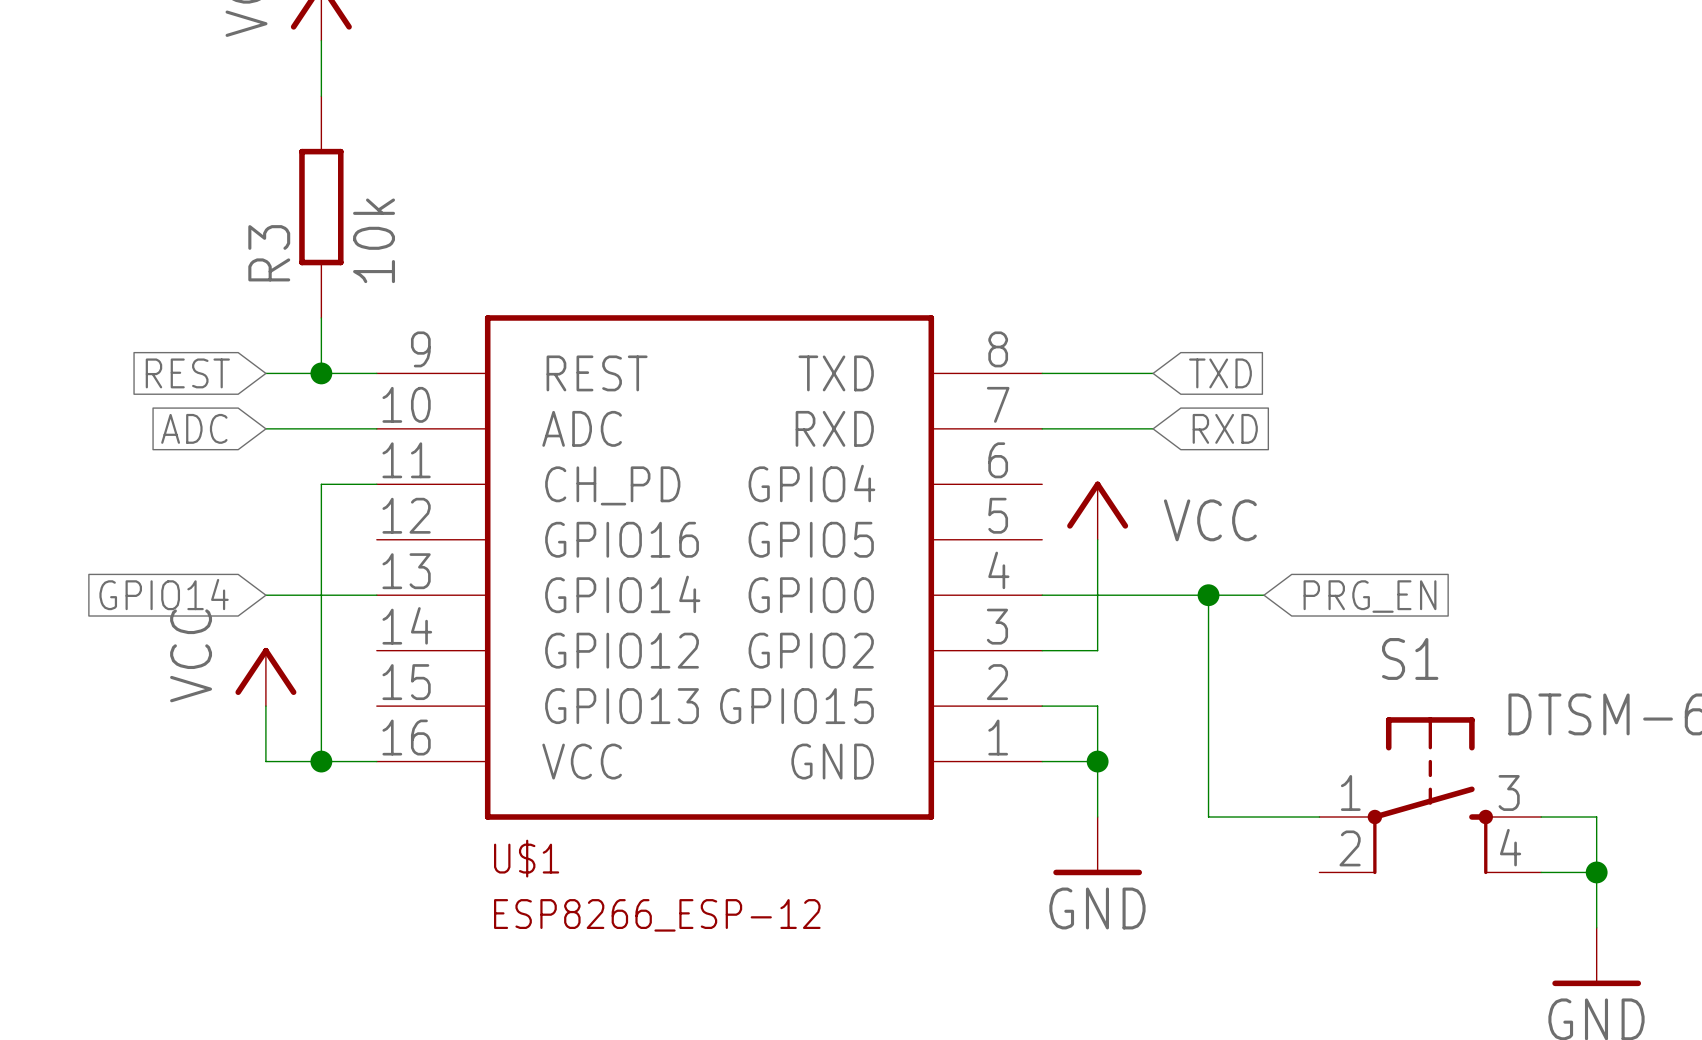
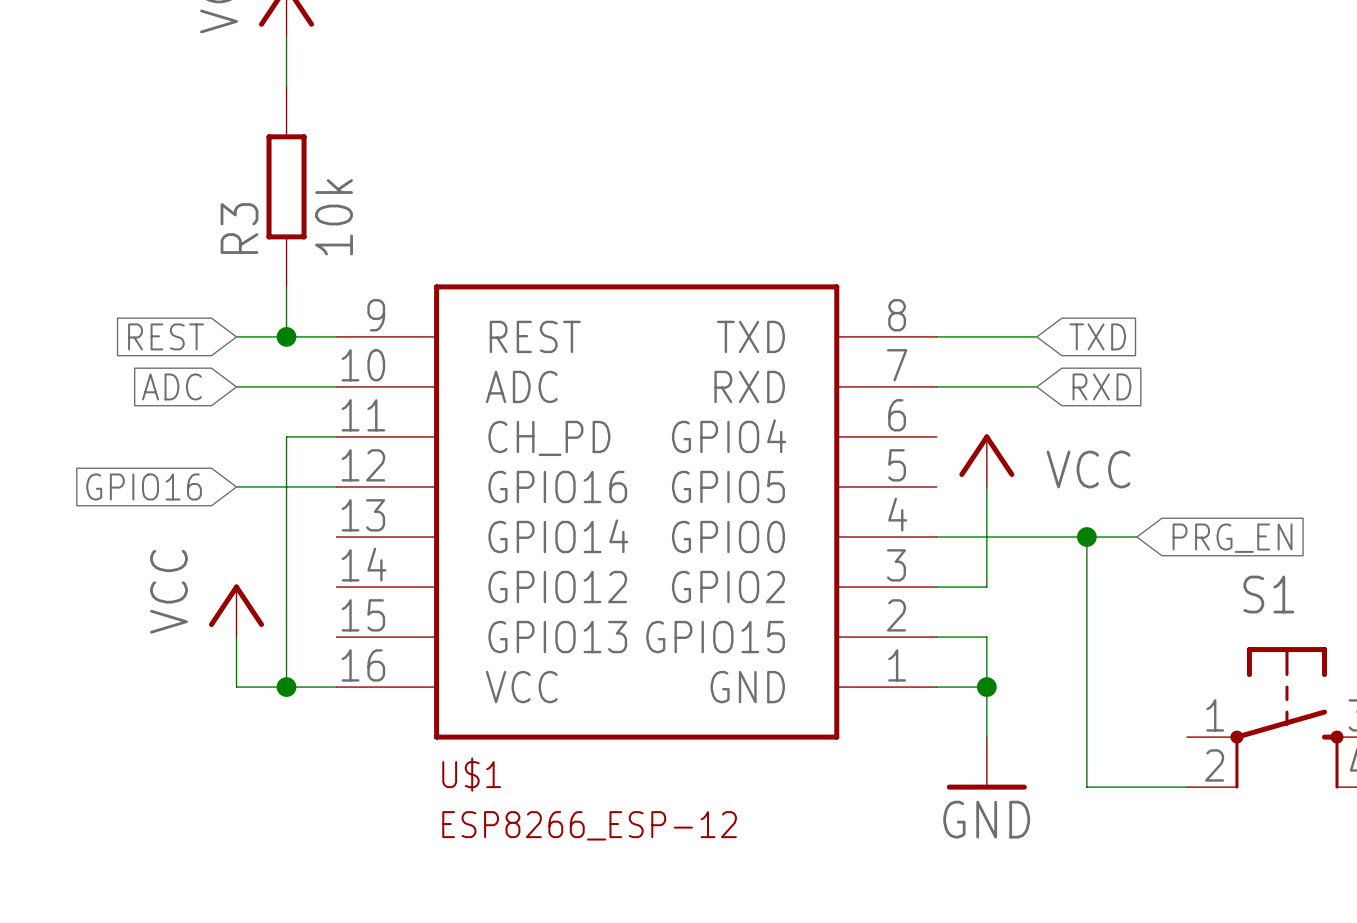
global label: GPIO14 (164, 594) -> GPIO16 (144, 486)
wire: (265, 595) (376, 595) -> (236, 486) (336, 486)
wire: (1208, 817) (1319, 817) -> (1086, 737) (1086, 787) (1186, 787)

